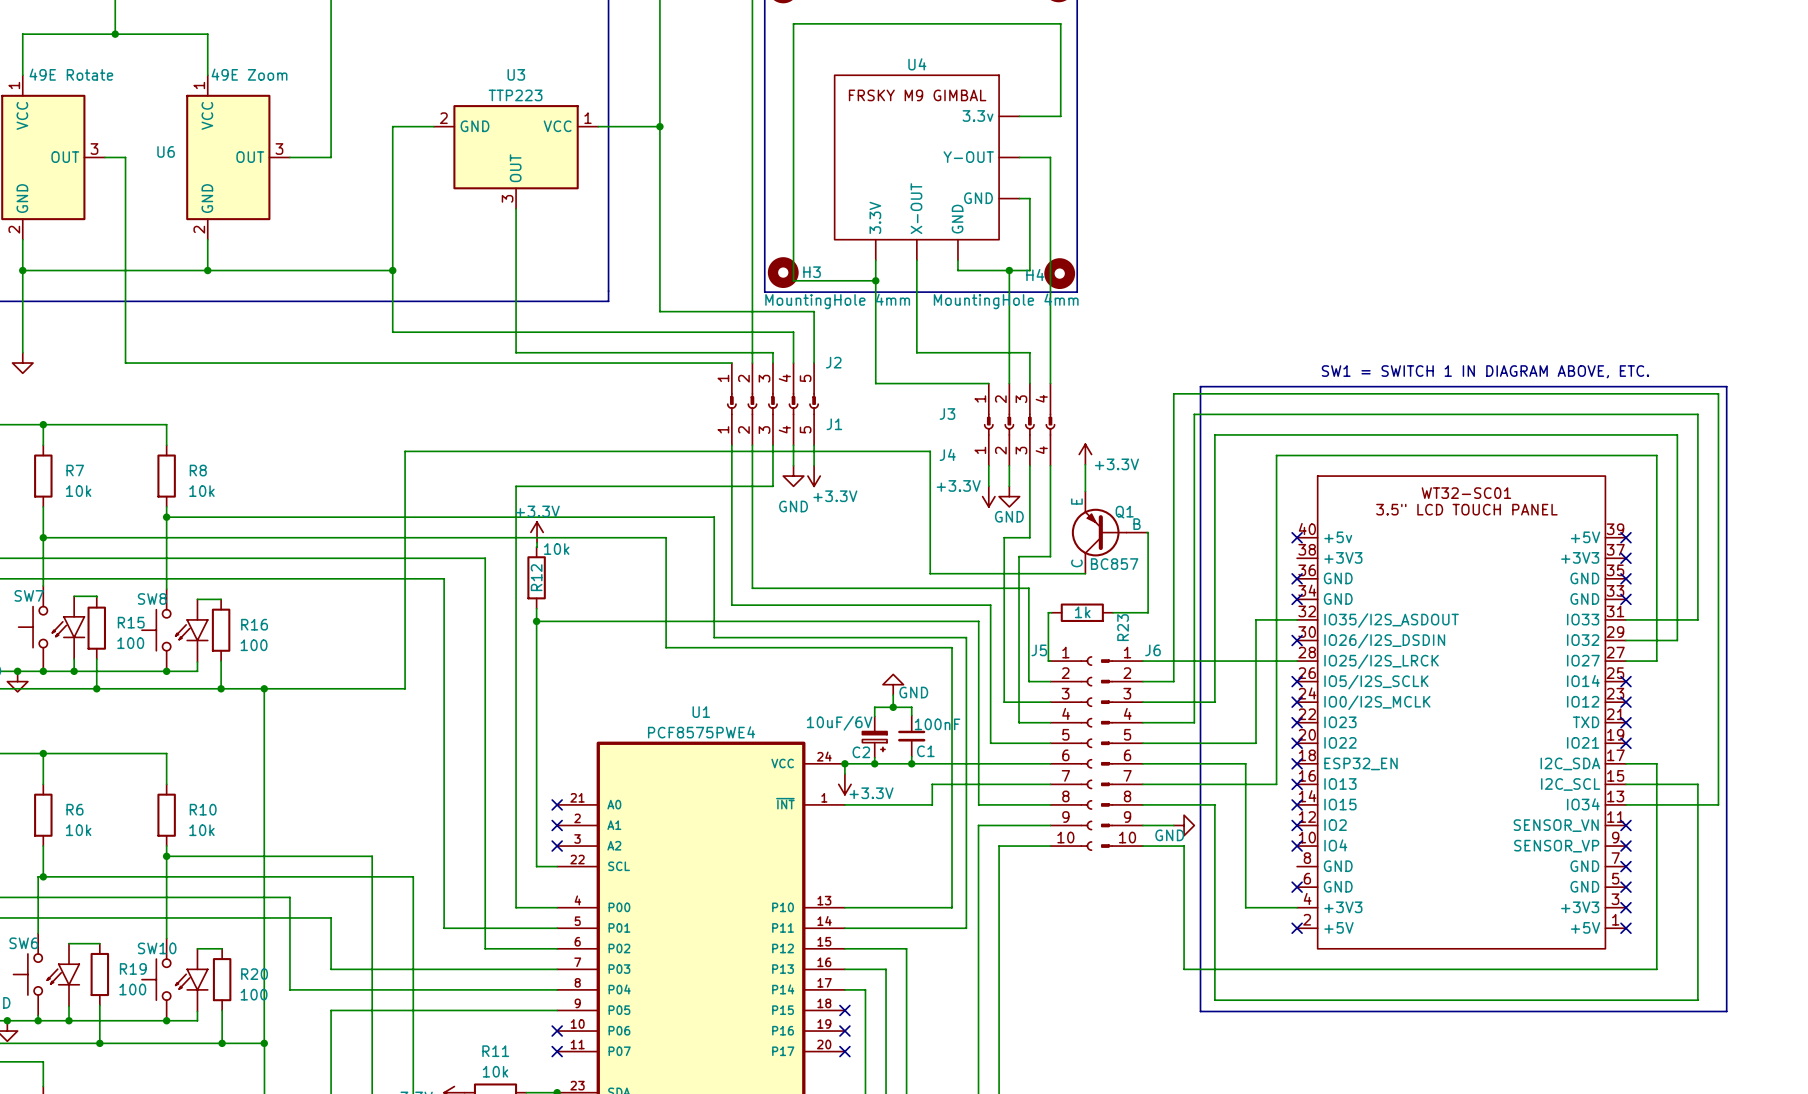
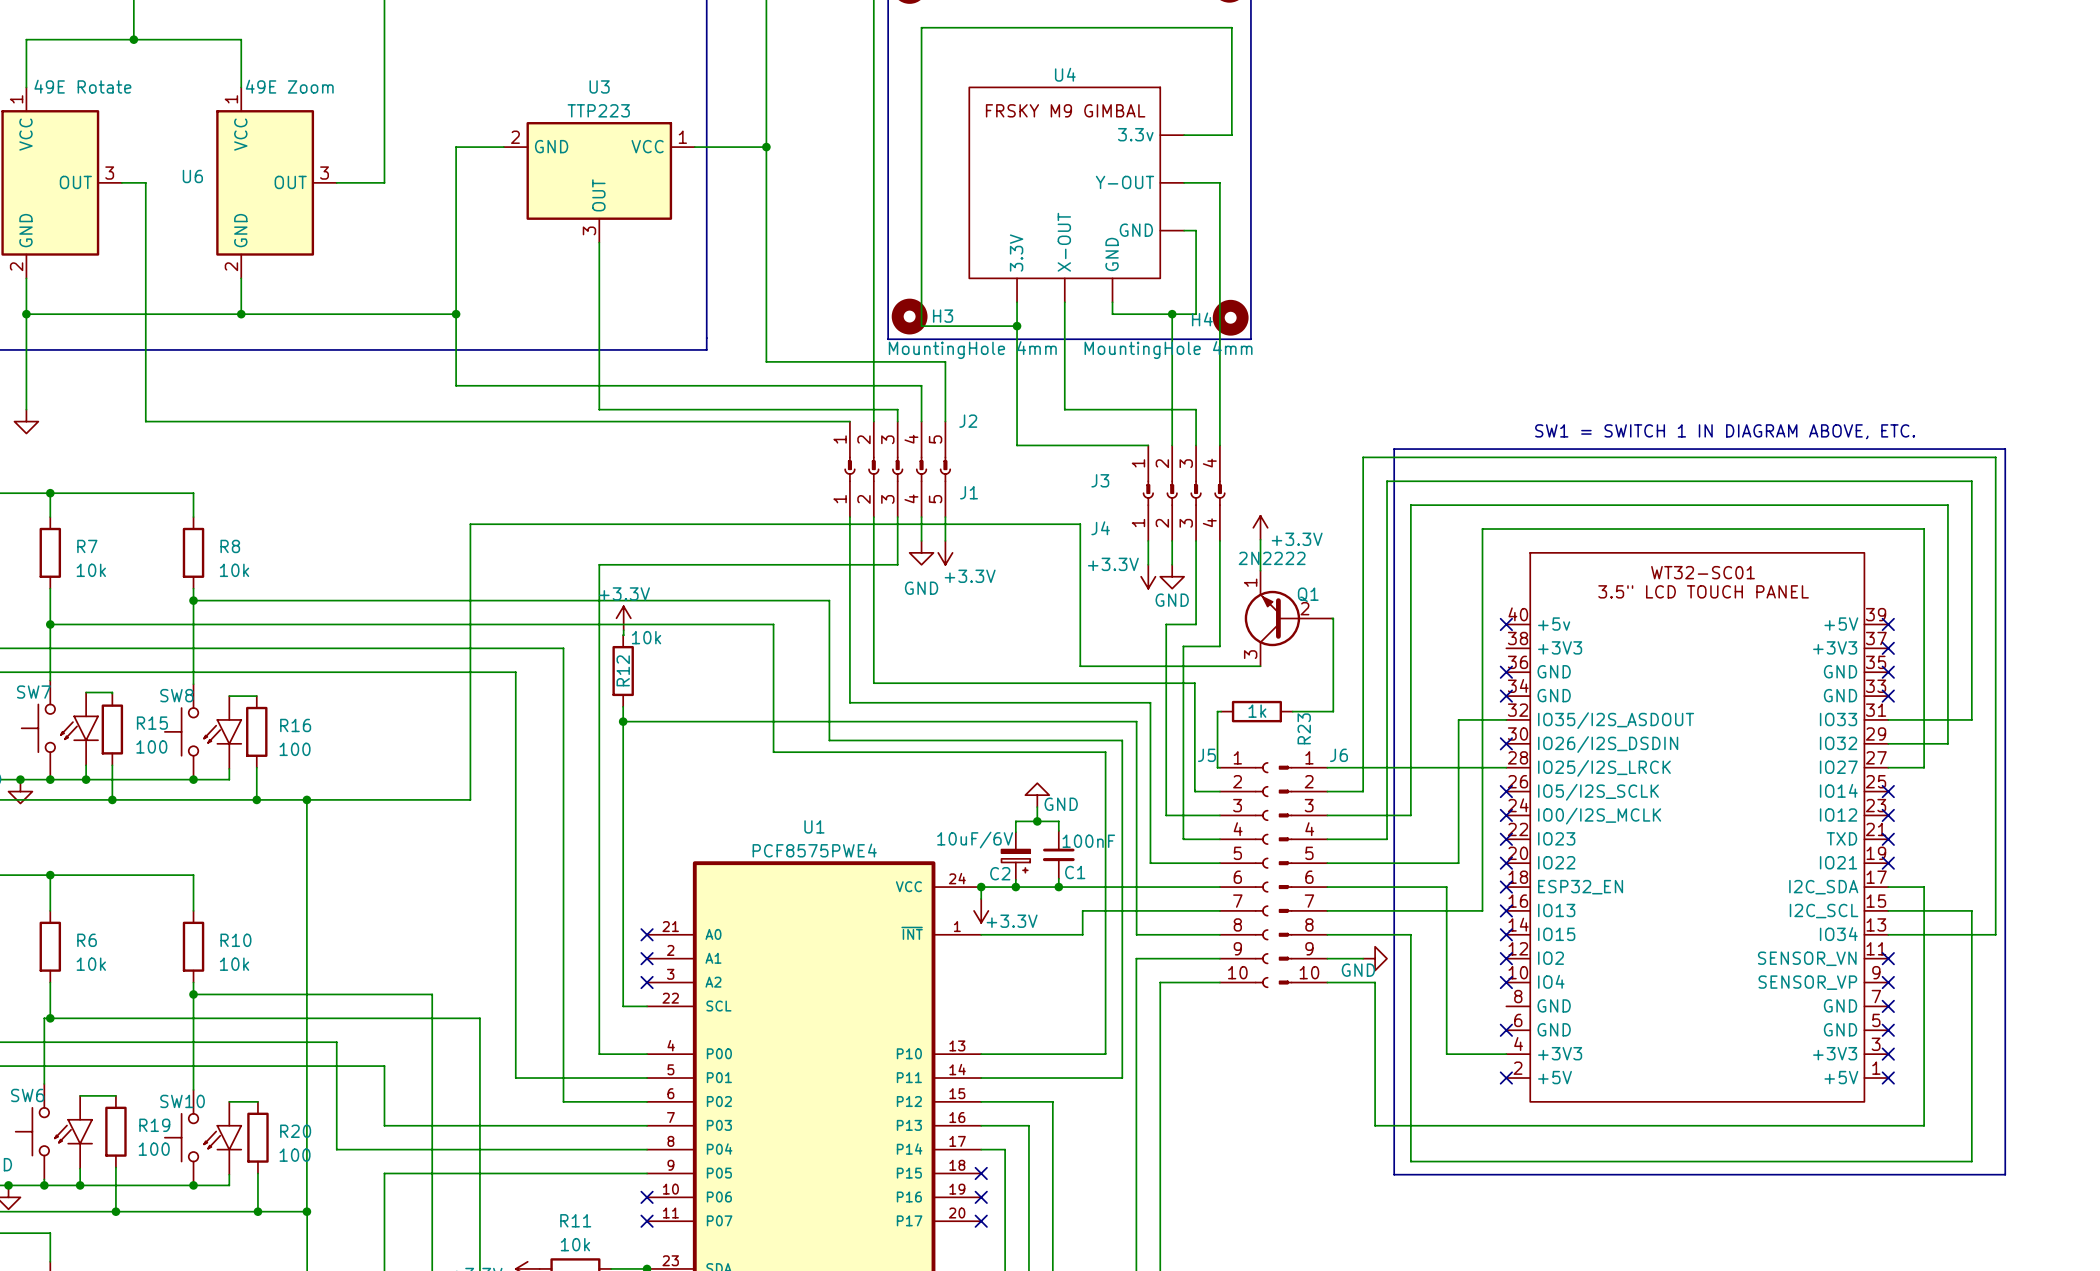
Q1 symbol: [1071, 491, 1148, 574] -> [1244, 570, 1333, 667]
Q1 value: BC857 (1114, 564) -> 2N2222 (1272, 558)

